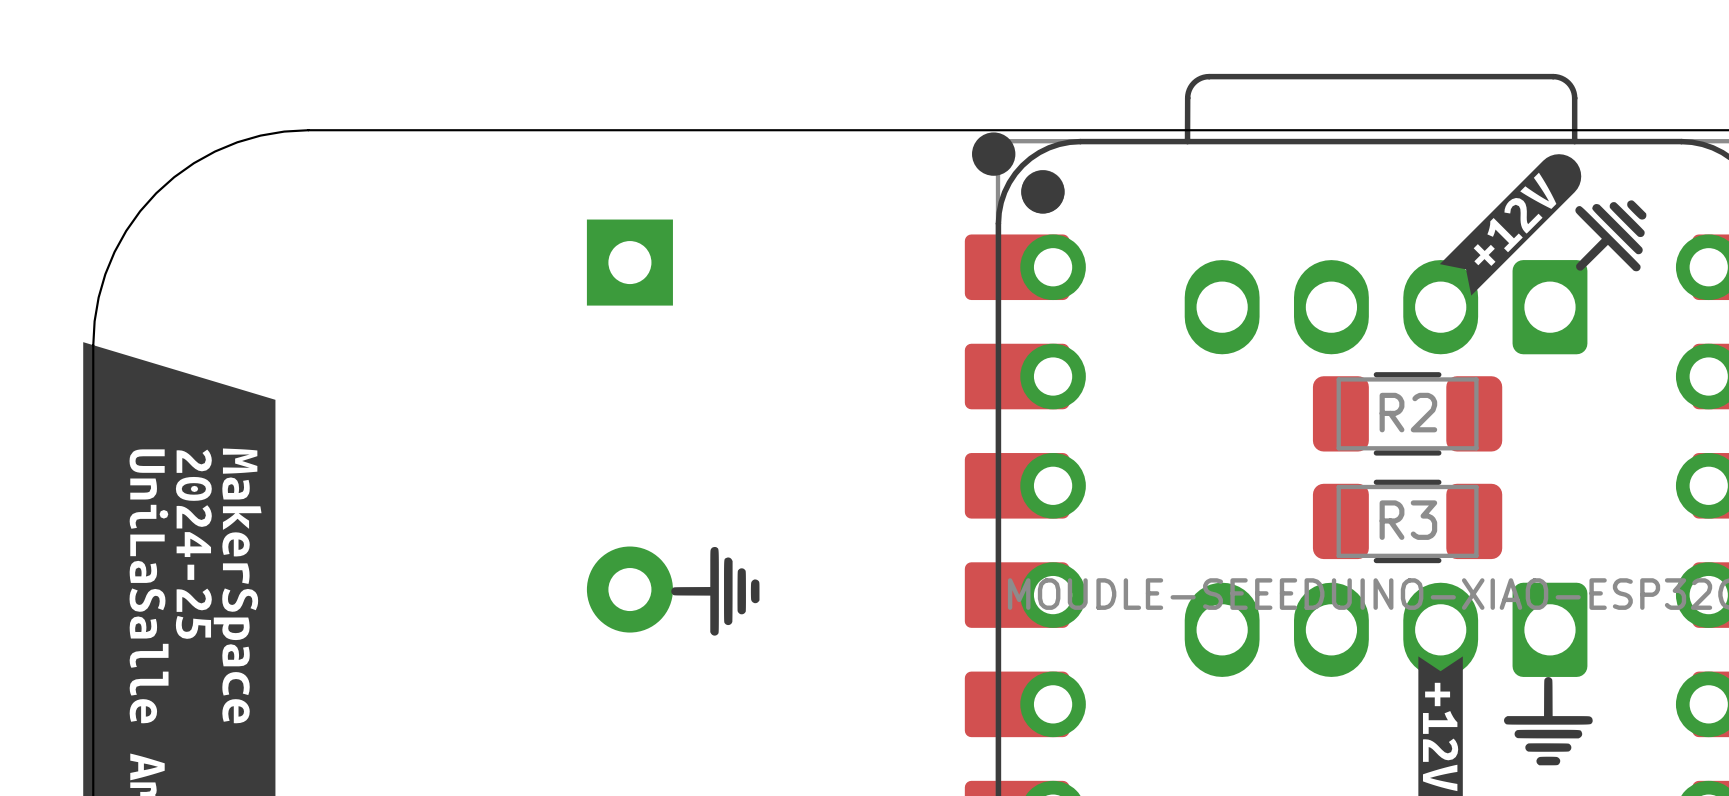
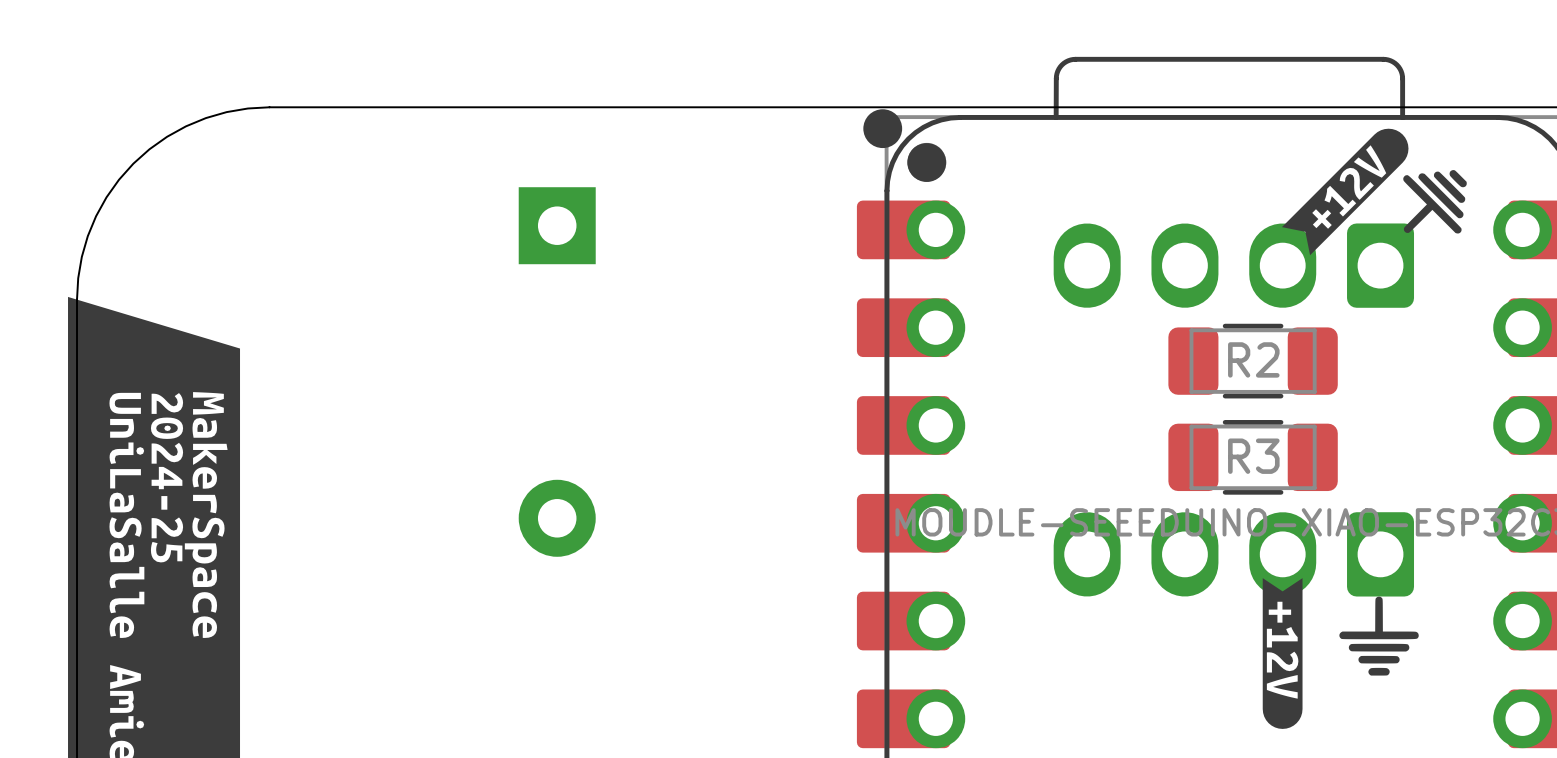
drawing: [671, 546, 760, 636] -> none

